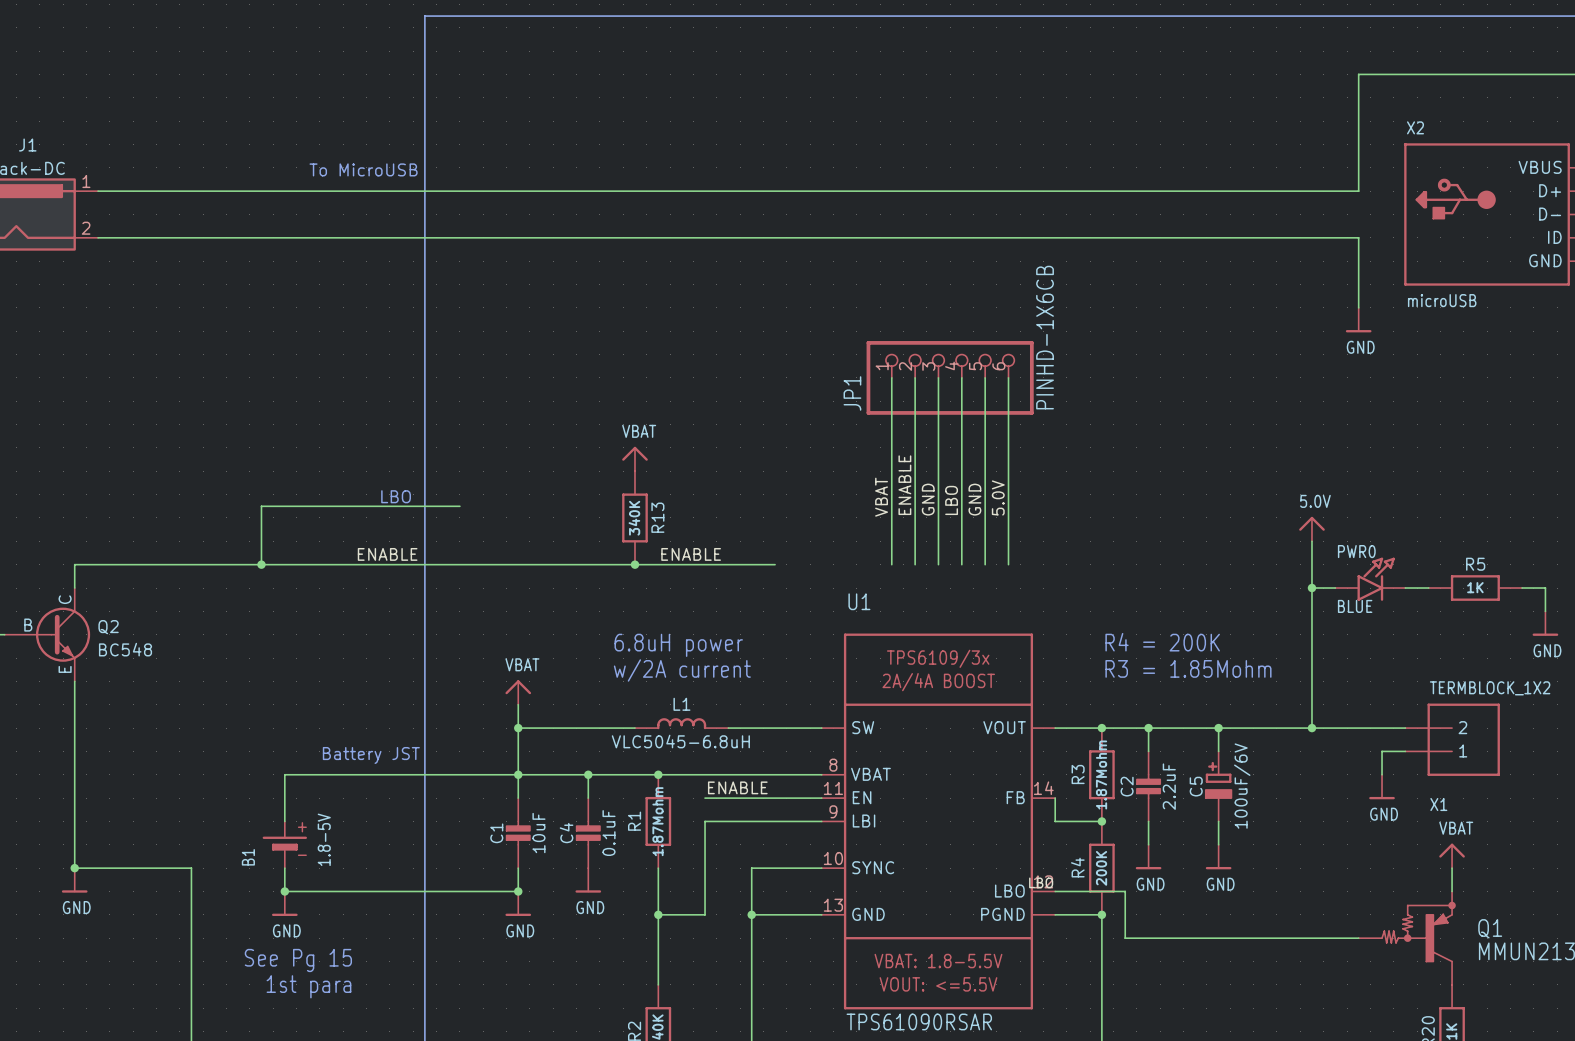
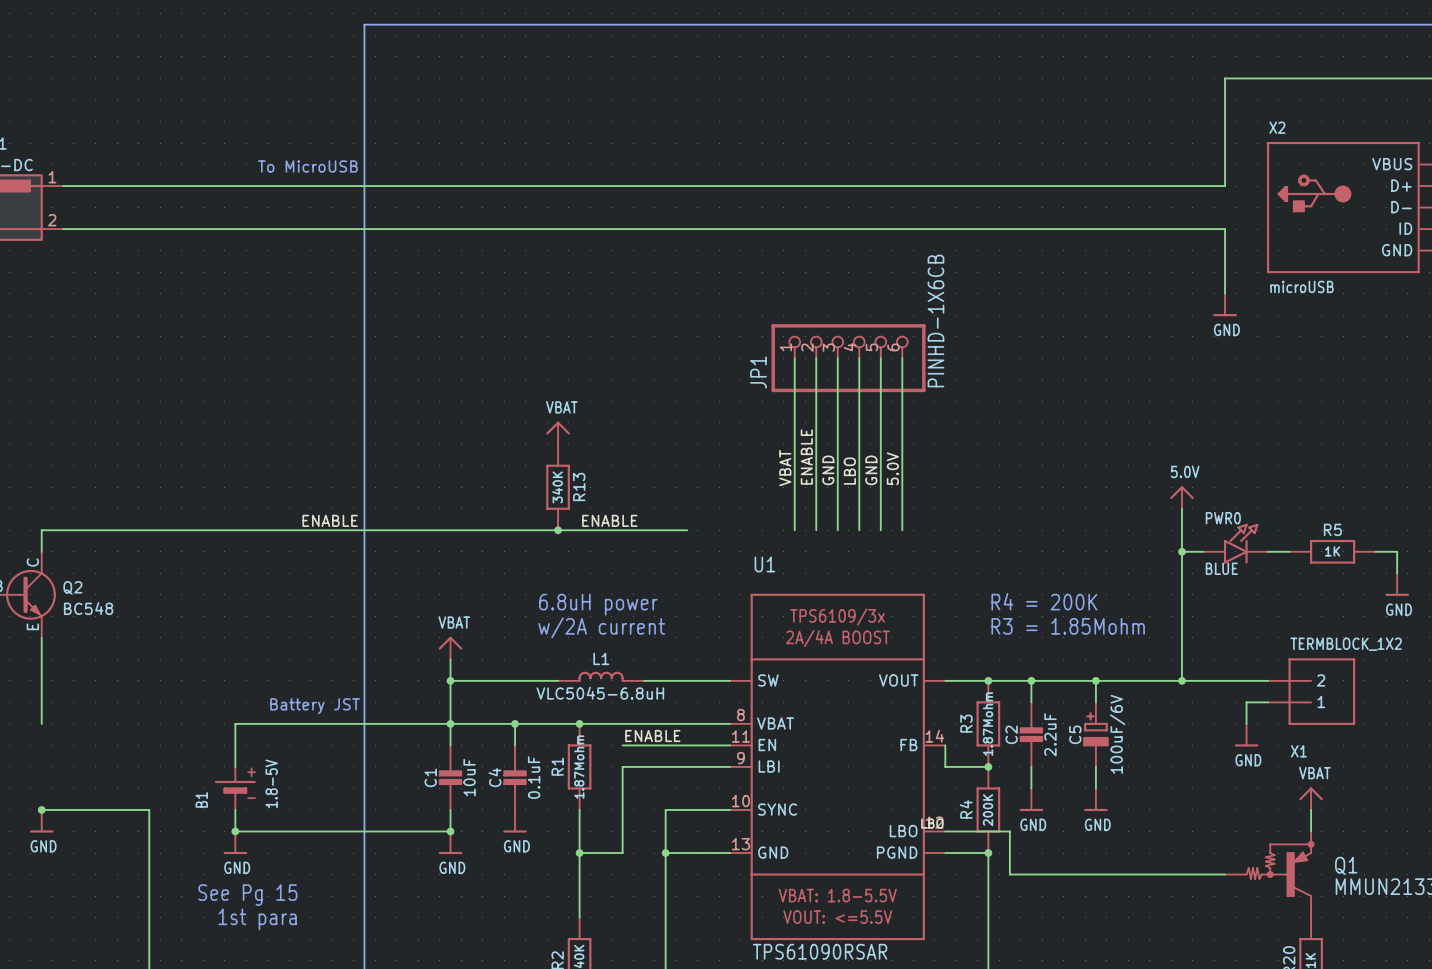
text: LBO (396, 496) -> none
wire: (459, 506) (261, 506) (261, 564) -> none
junction: (261, 564) -> none
wire: (74, 774) (74, 868) -> none

